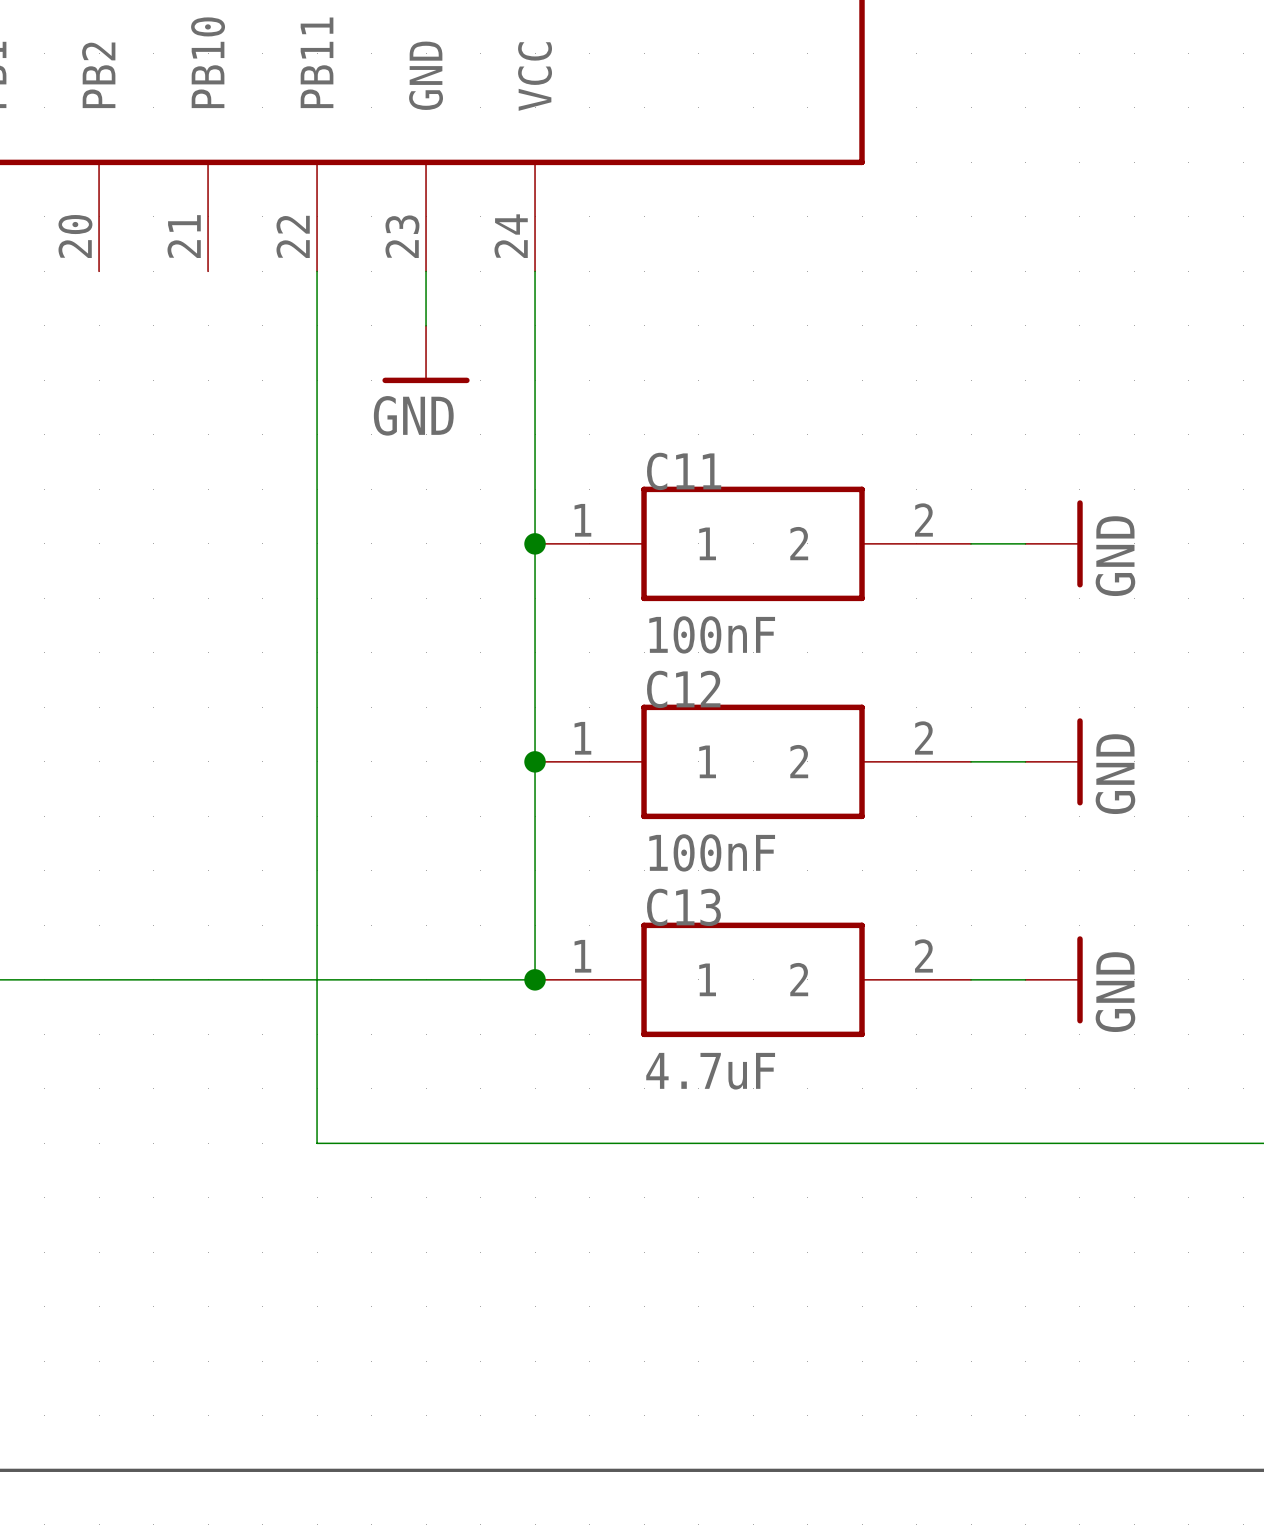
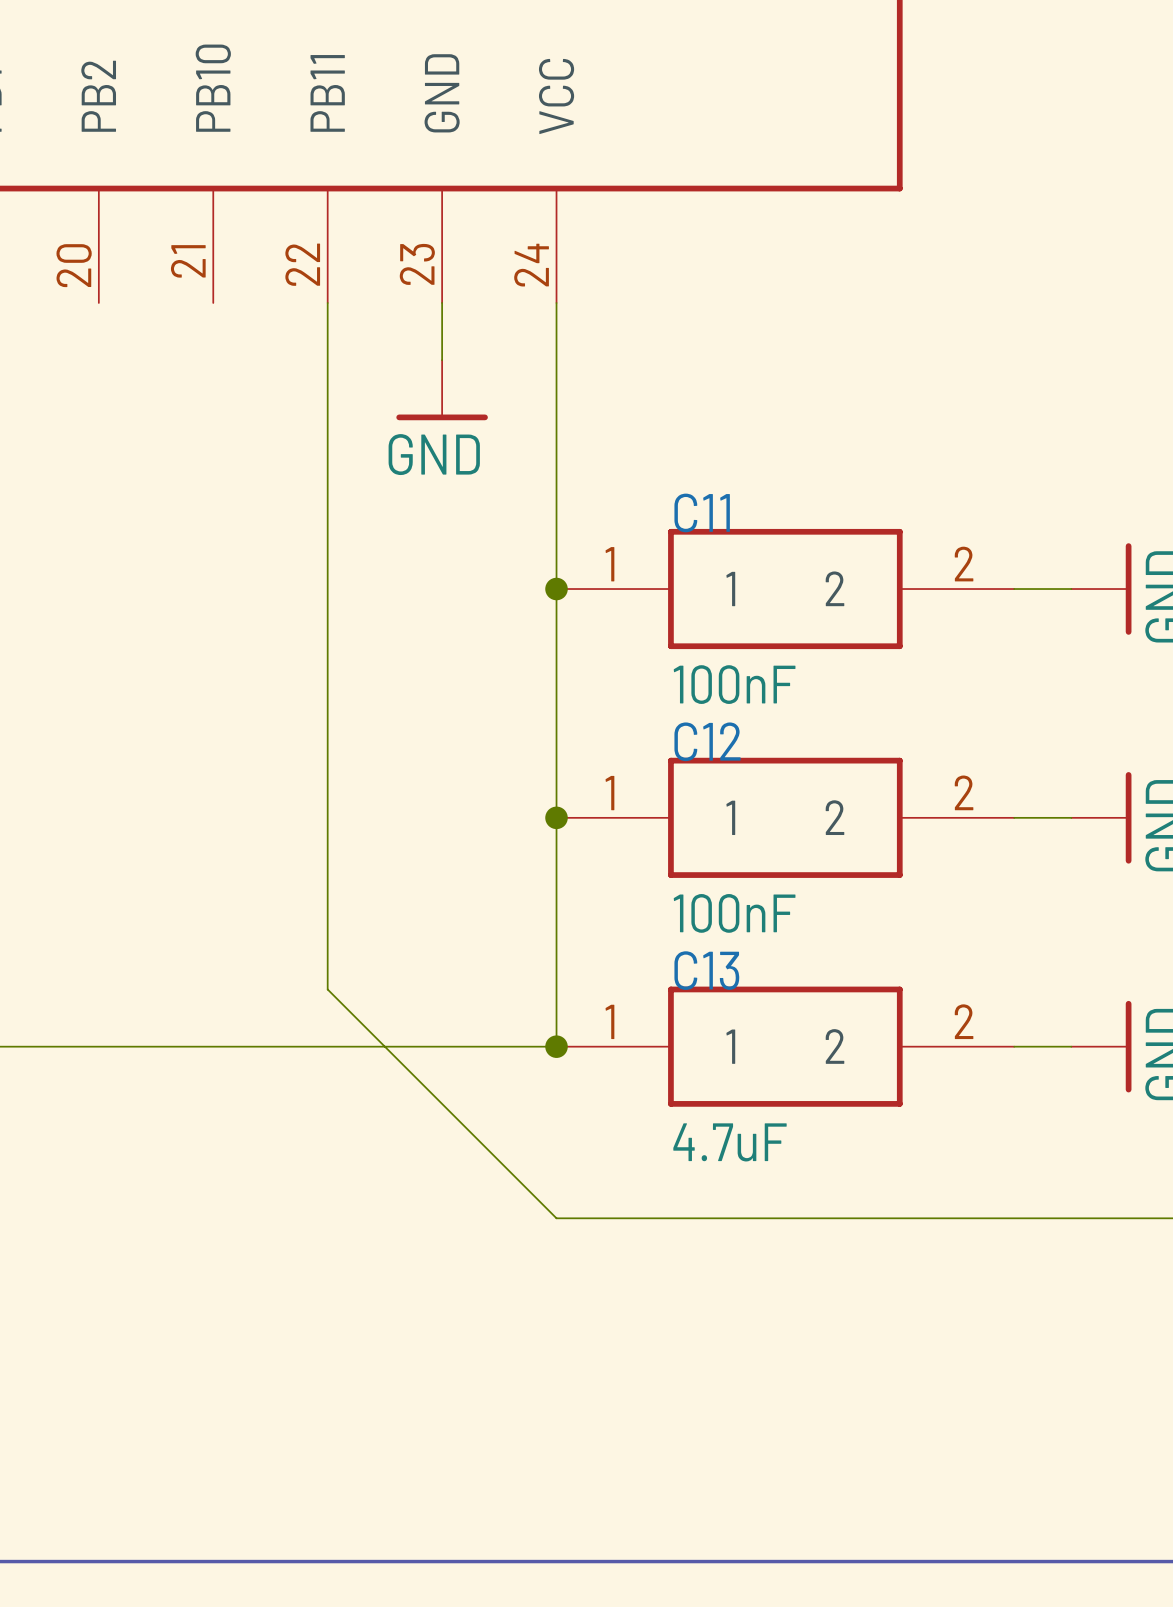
wire: (317, 925) (317, 1143) (535, 1143) -> (327, 989) (556, 1218)

